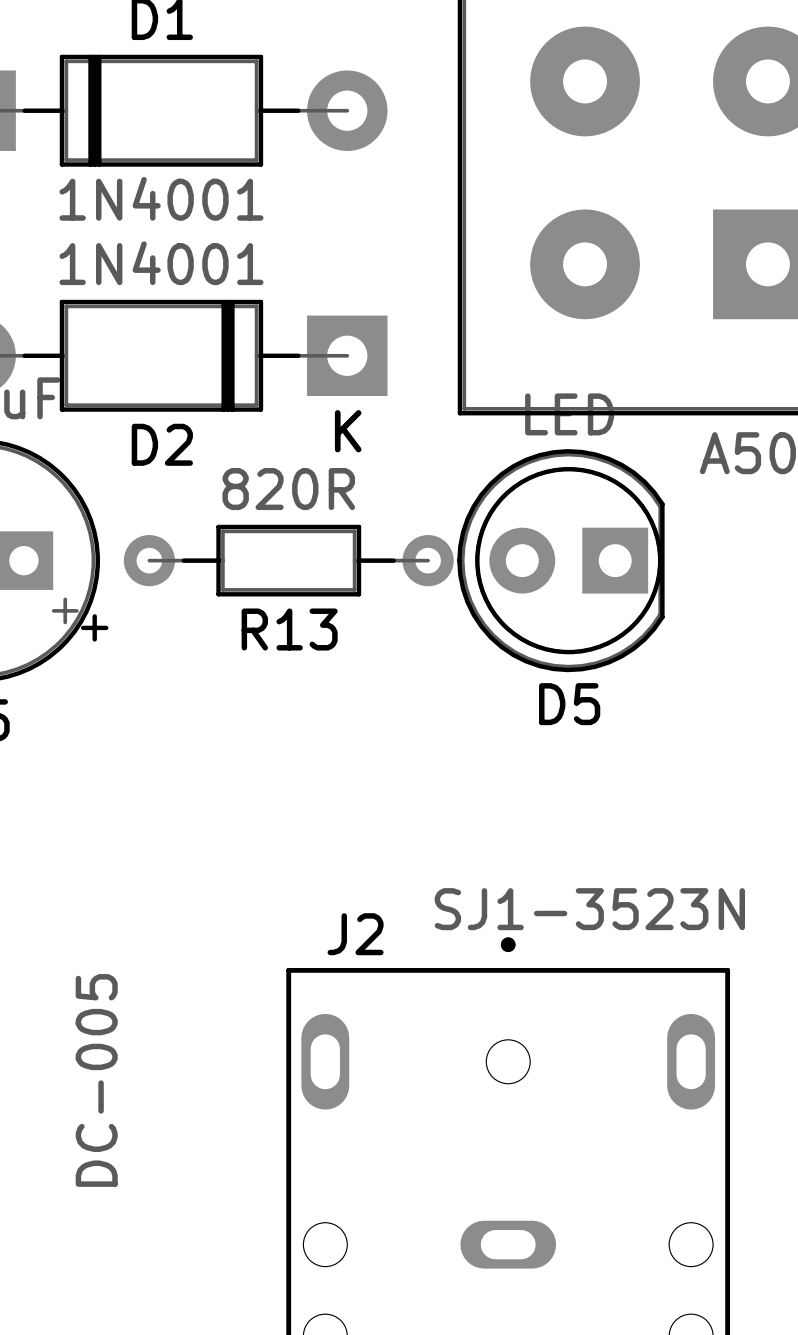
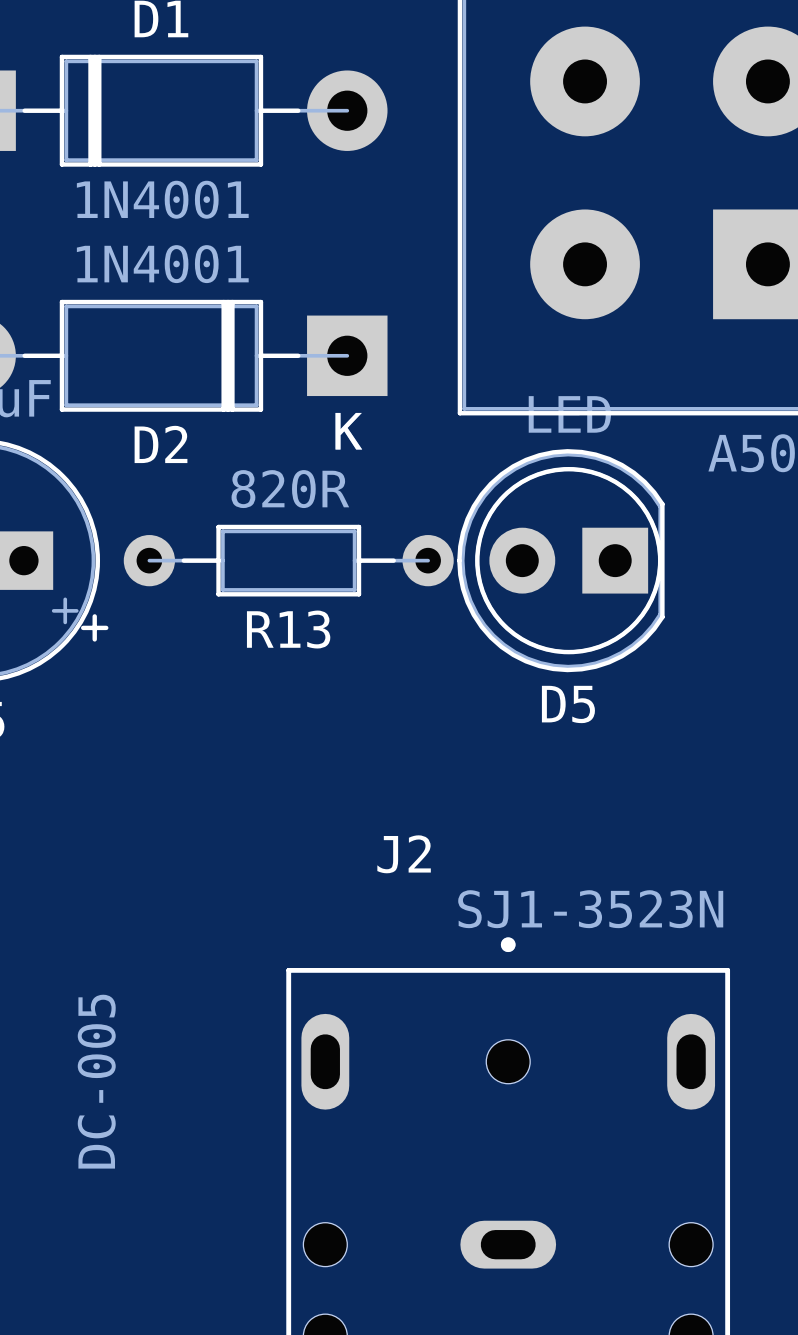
J2 name position: J2 (355, 934) -> J2 (404, 854)

